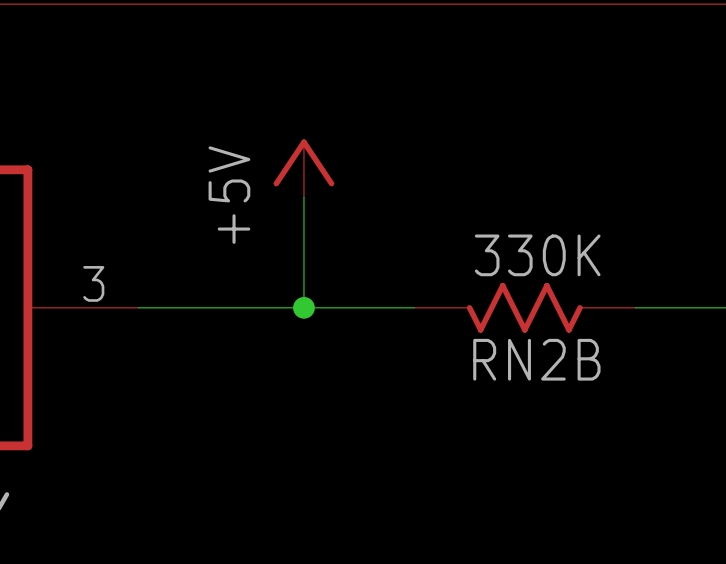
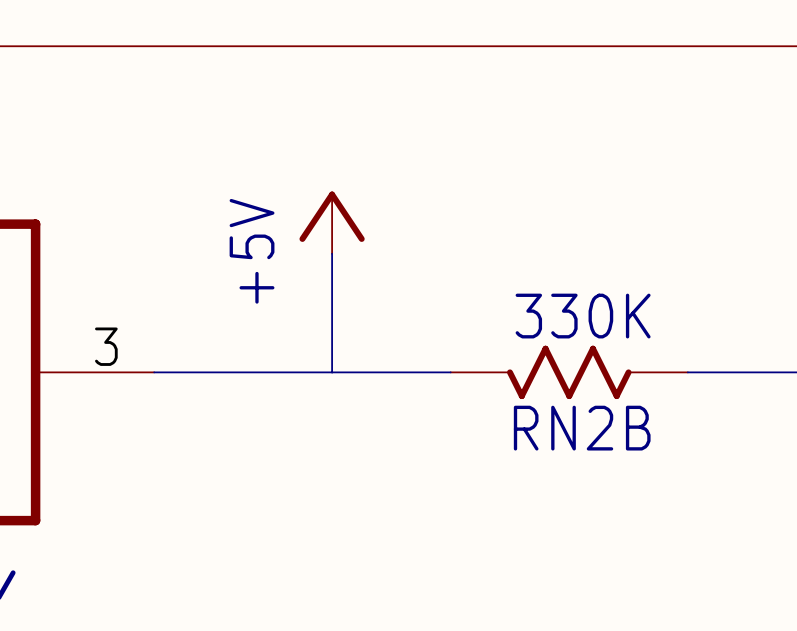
junction: (303, 307) -> none

